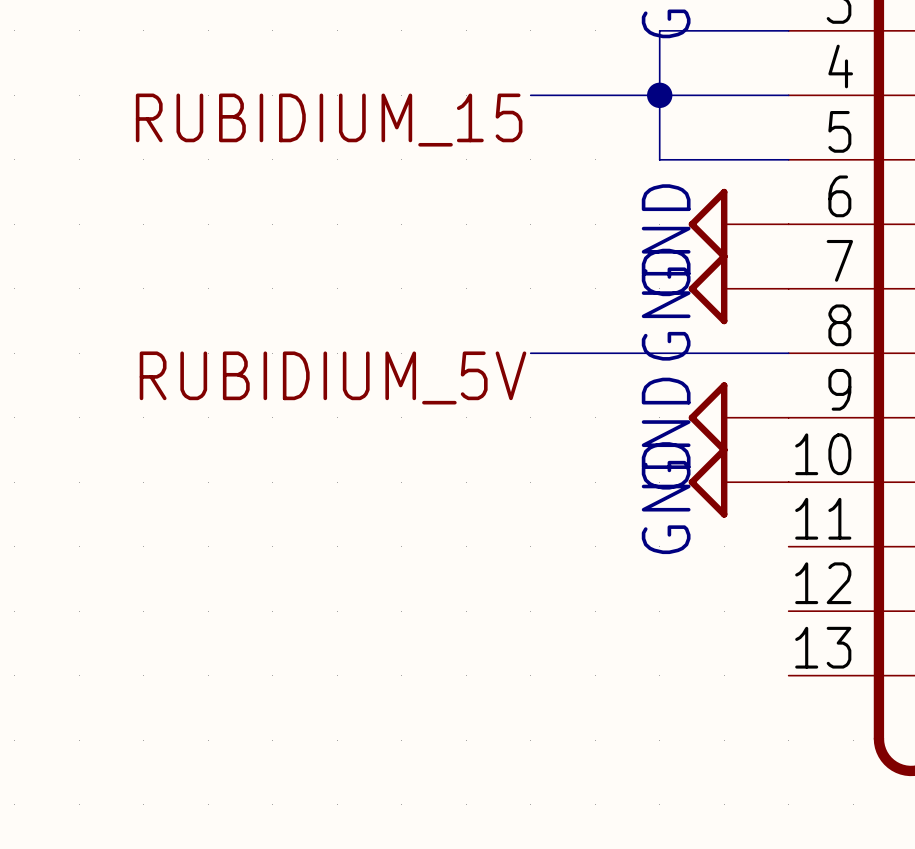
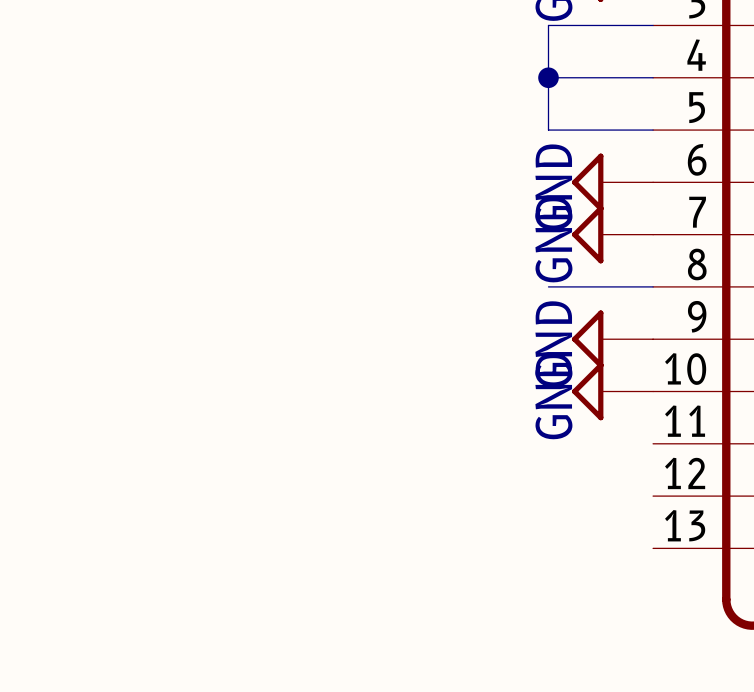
wire: (530, 95) (659, 95) -> none
label: RUBIDIUM_15 (329, 120) -> none
wire: (530, 353) (659, 353) -> none
label: RUBIDIUM_5V (333, 377) -> none

